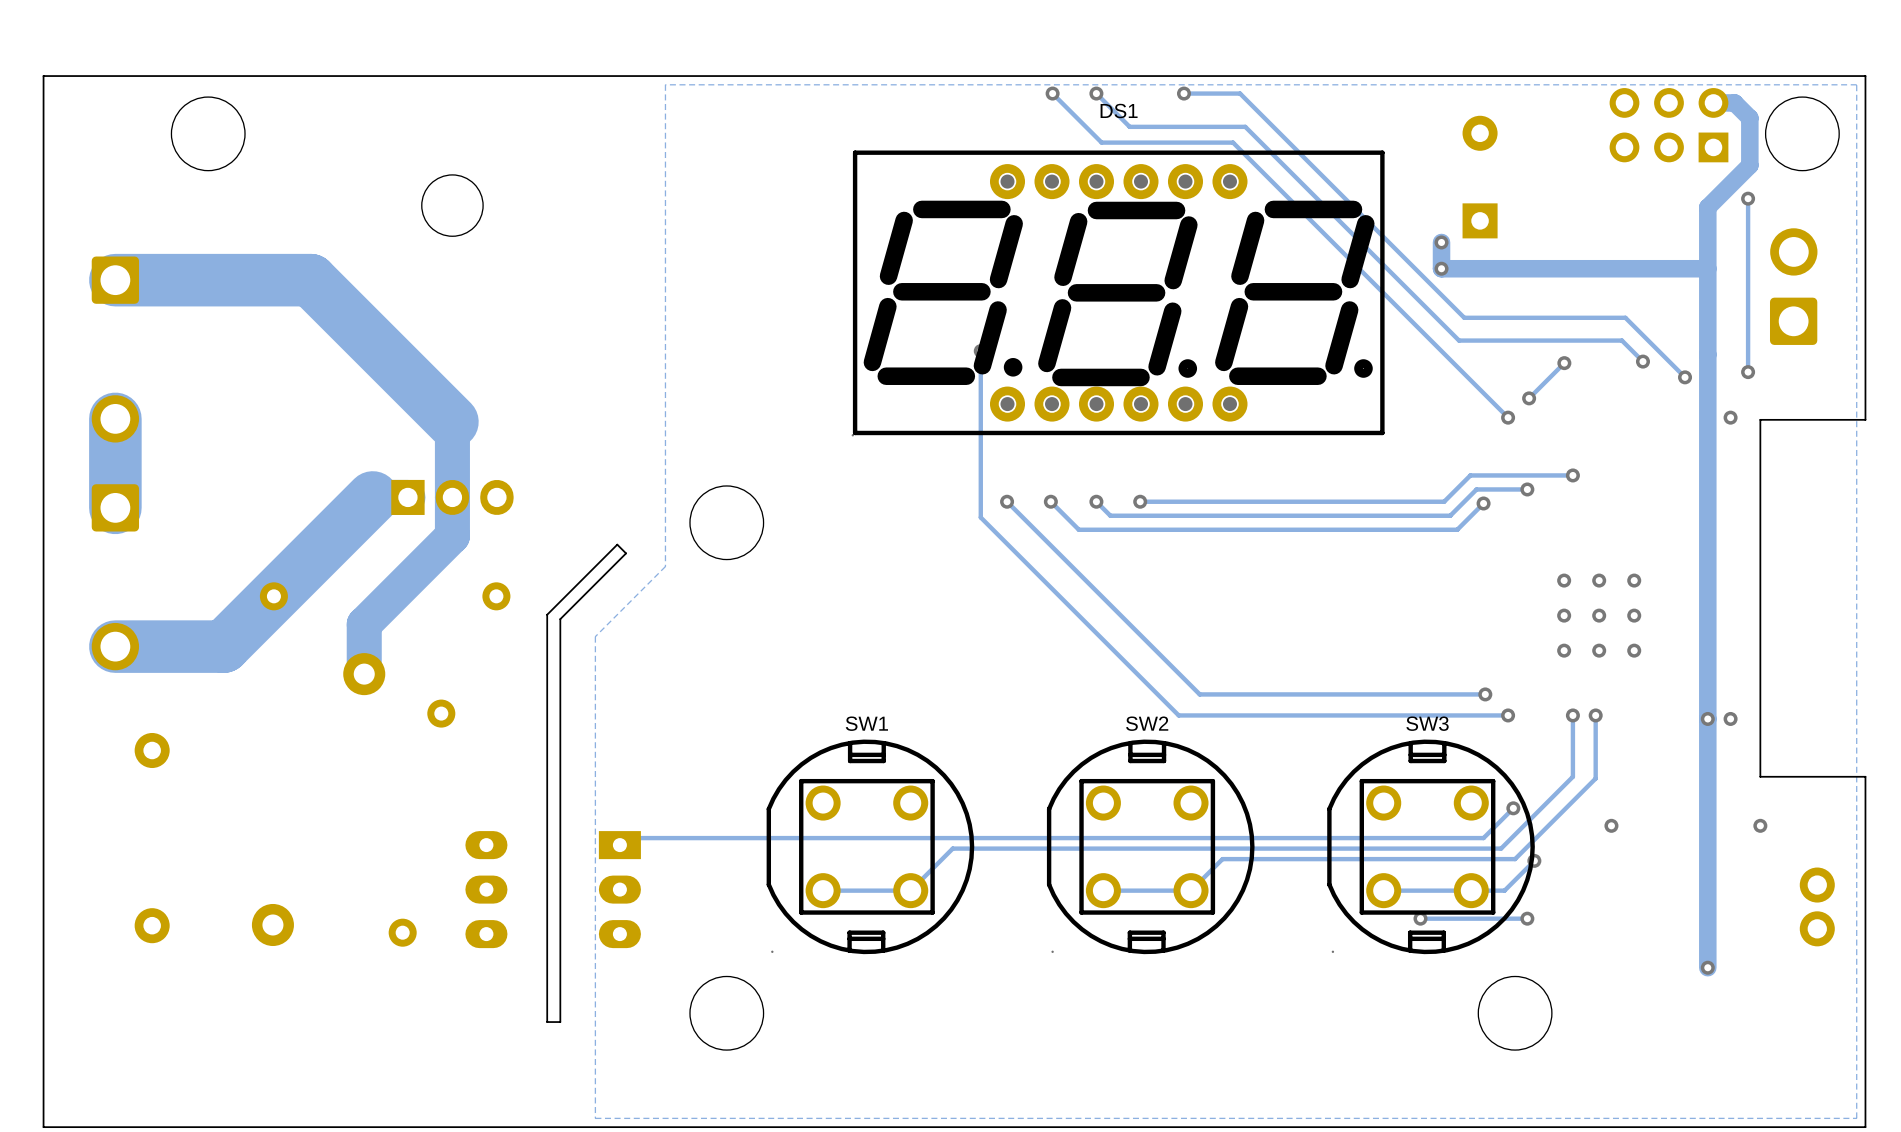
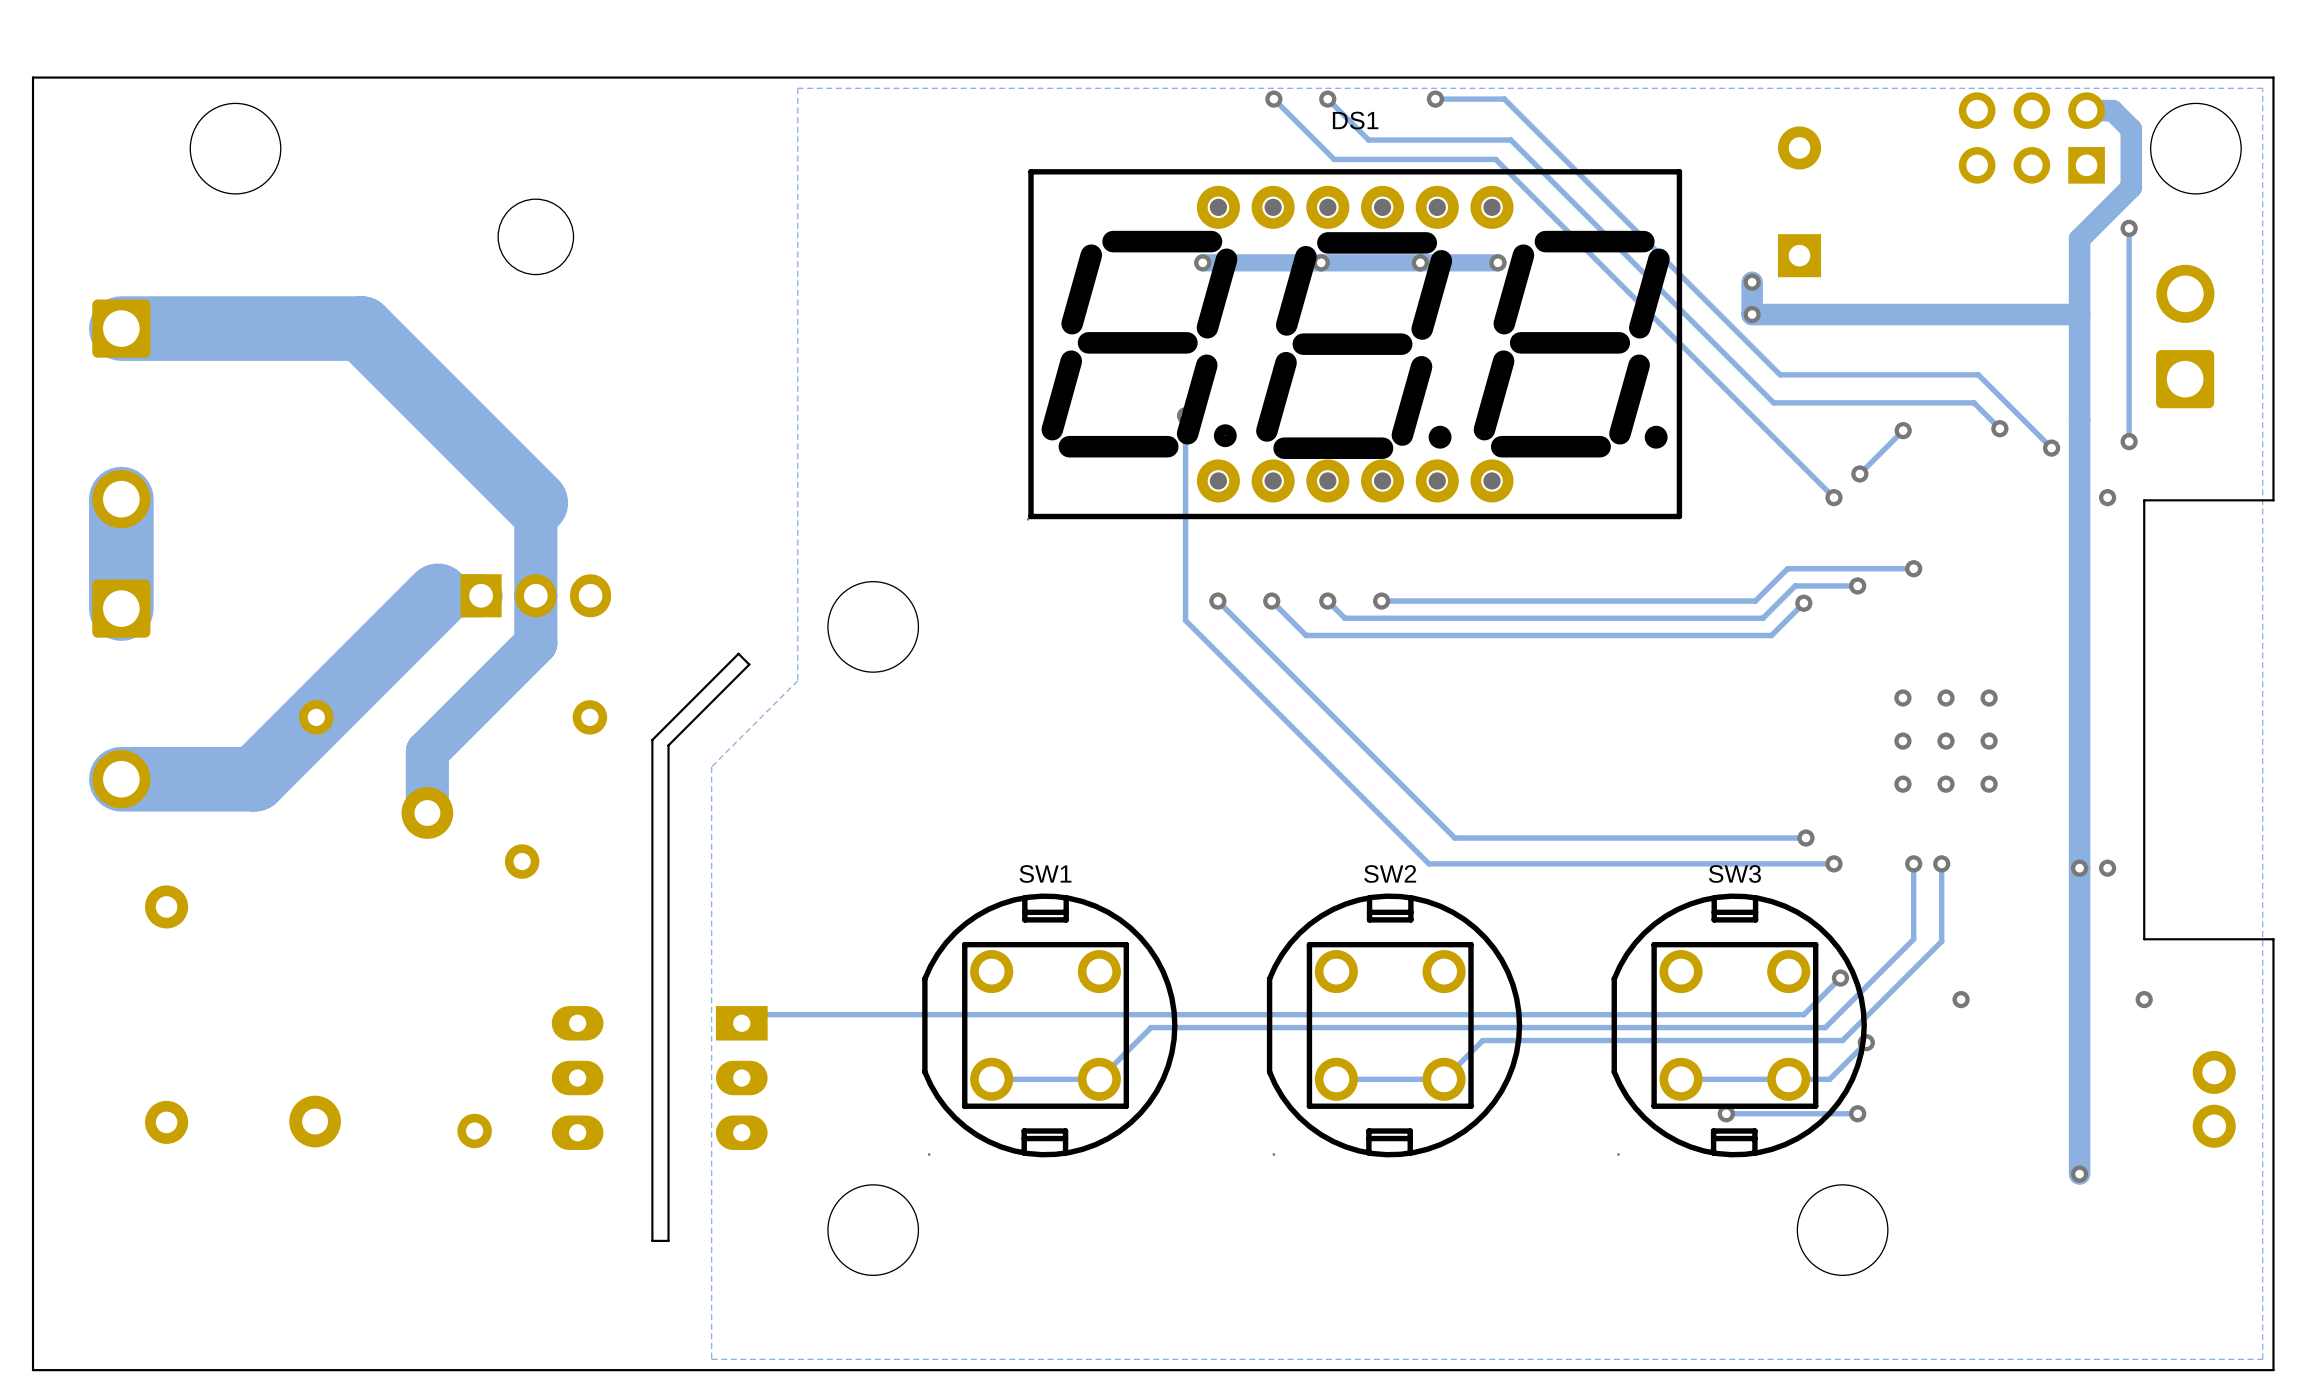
via: none -> (1202, 262)
via: none -> (1321, 262)
via: none -> (1420, 262)
track: none -> (1497, 262) (1202, 262)
via: none -> (1497, 262)

